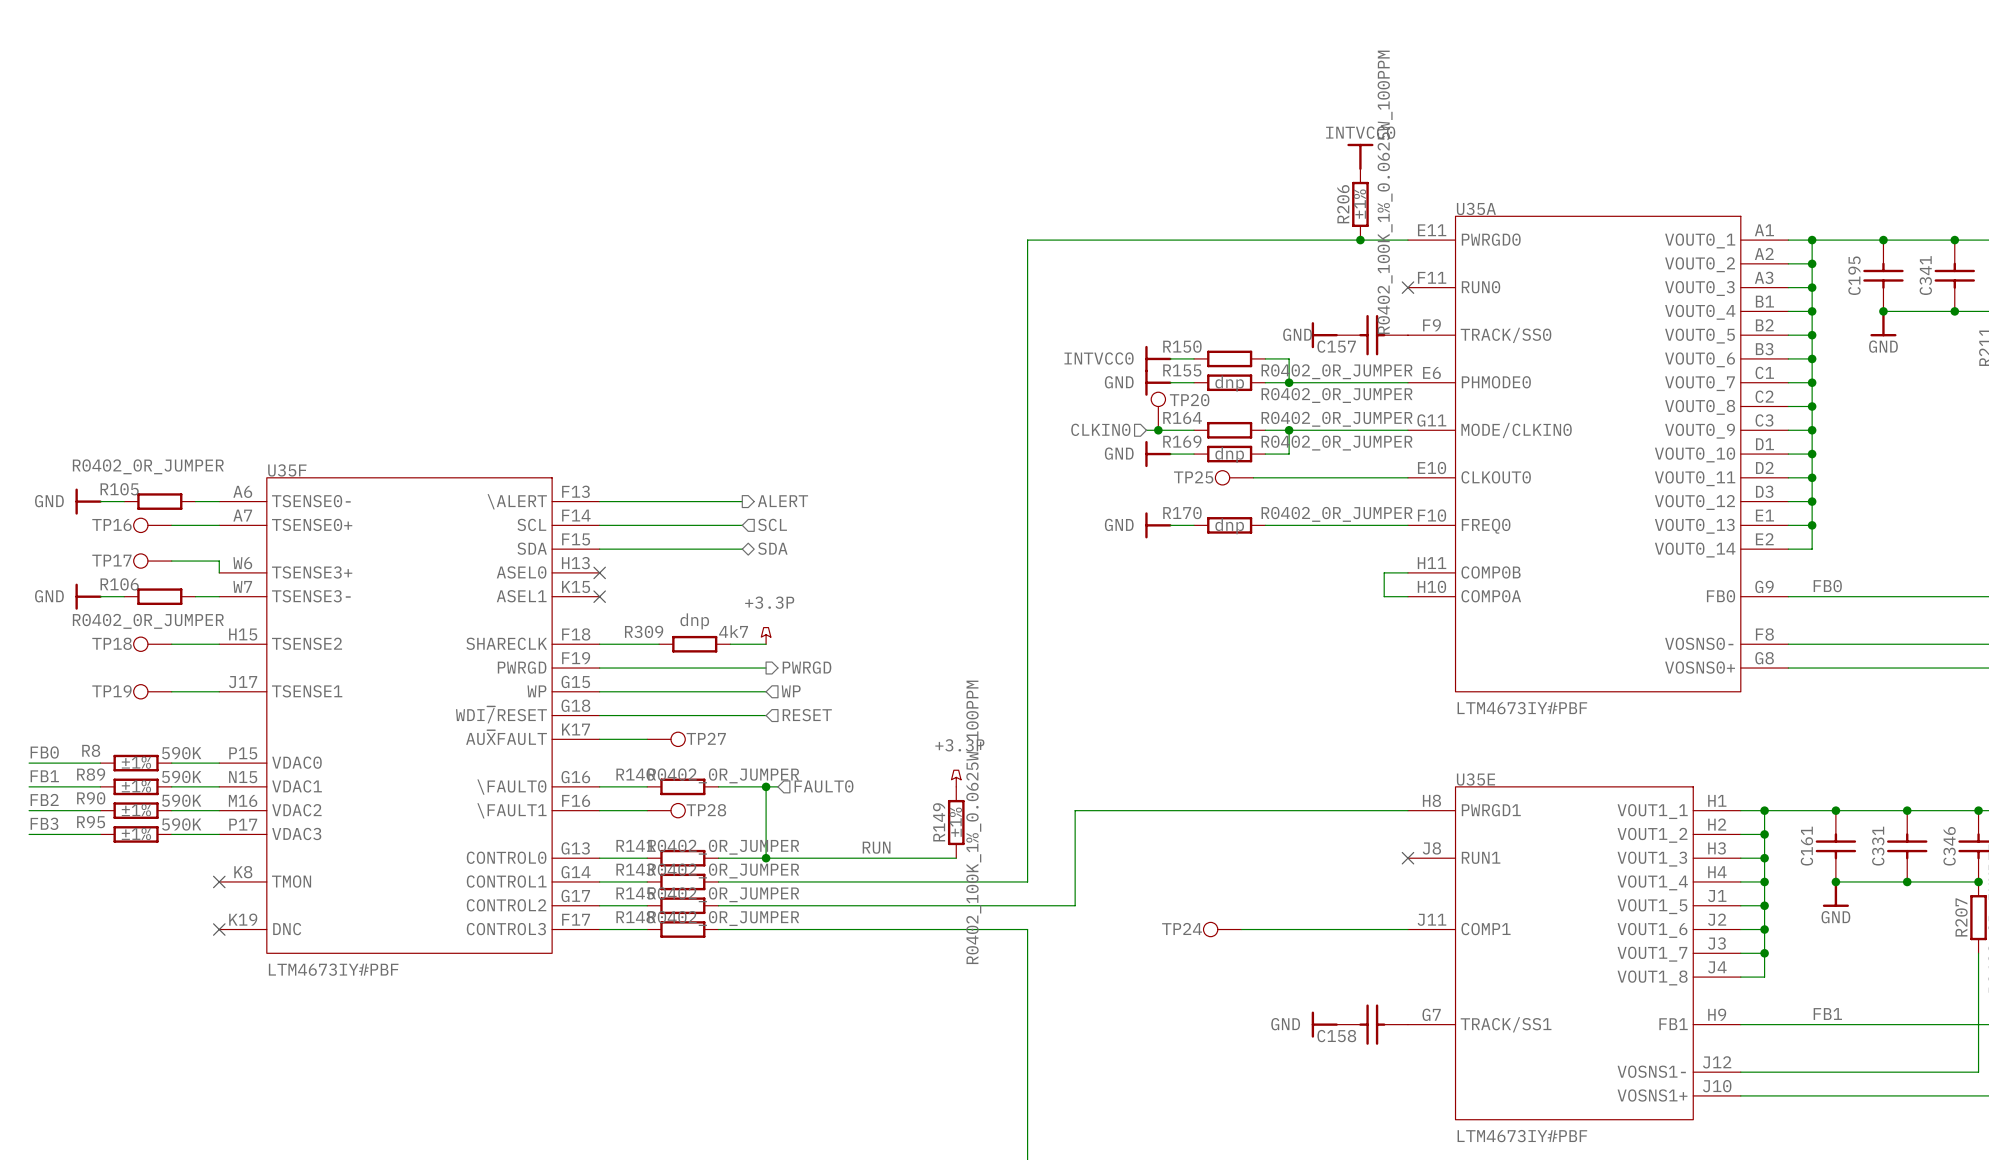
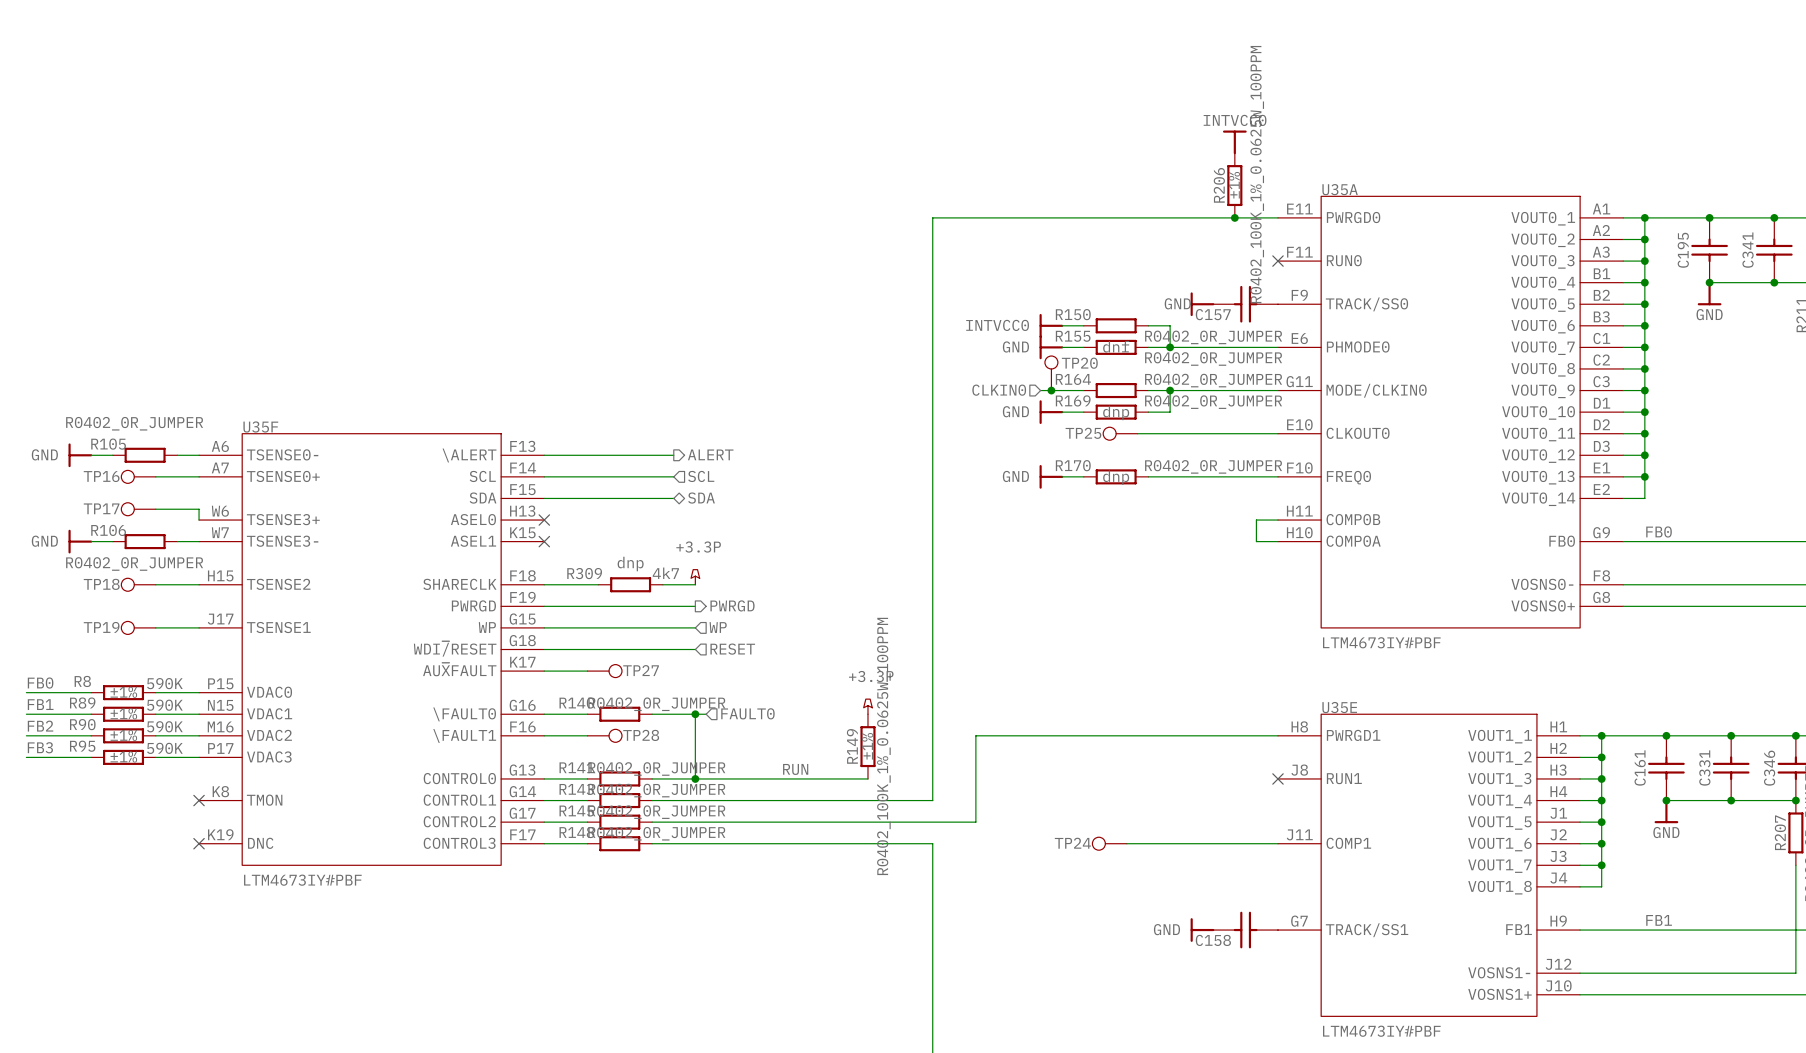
R155 text: dnp (1229, 383) -> dnf (1116, 346)

